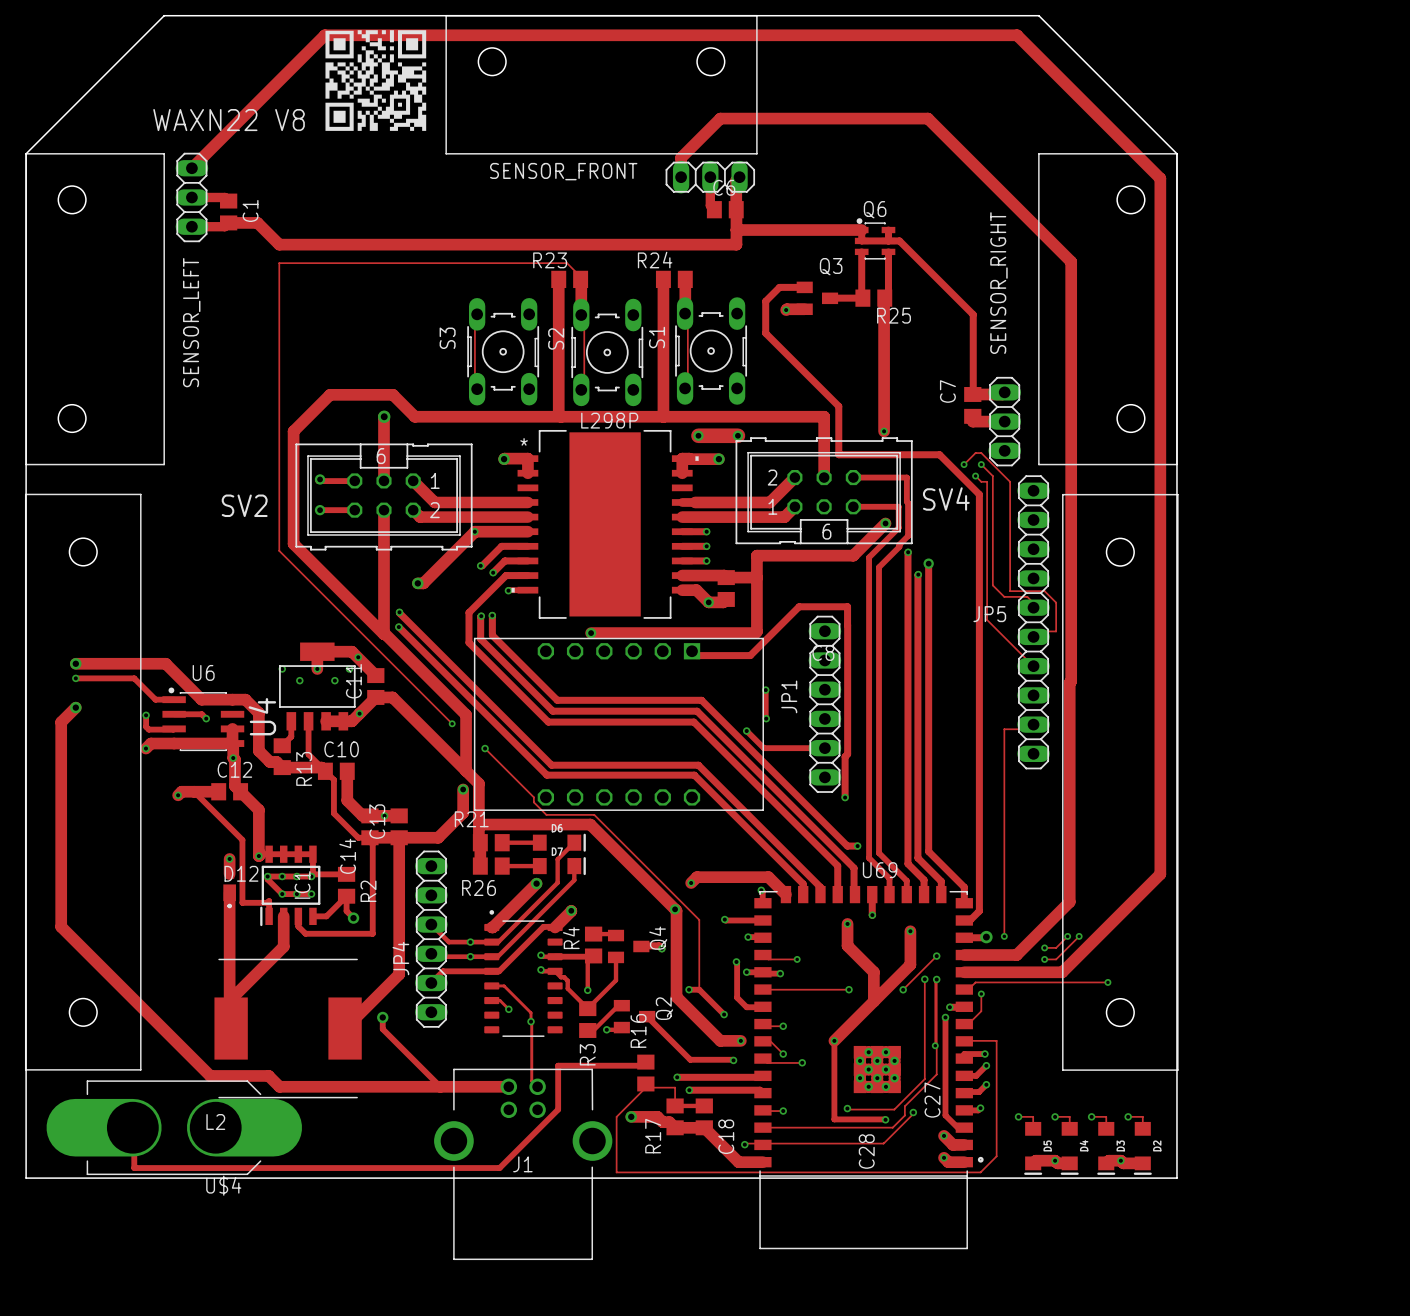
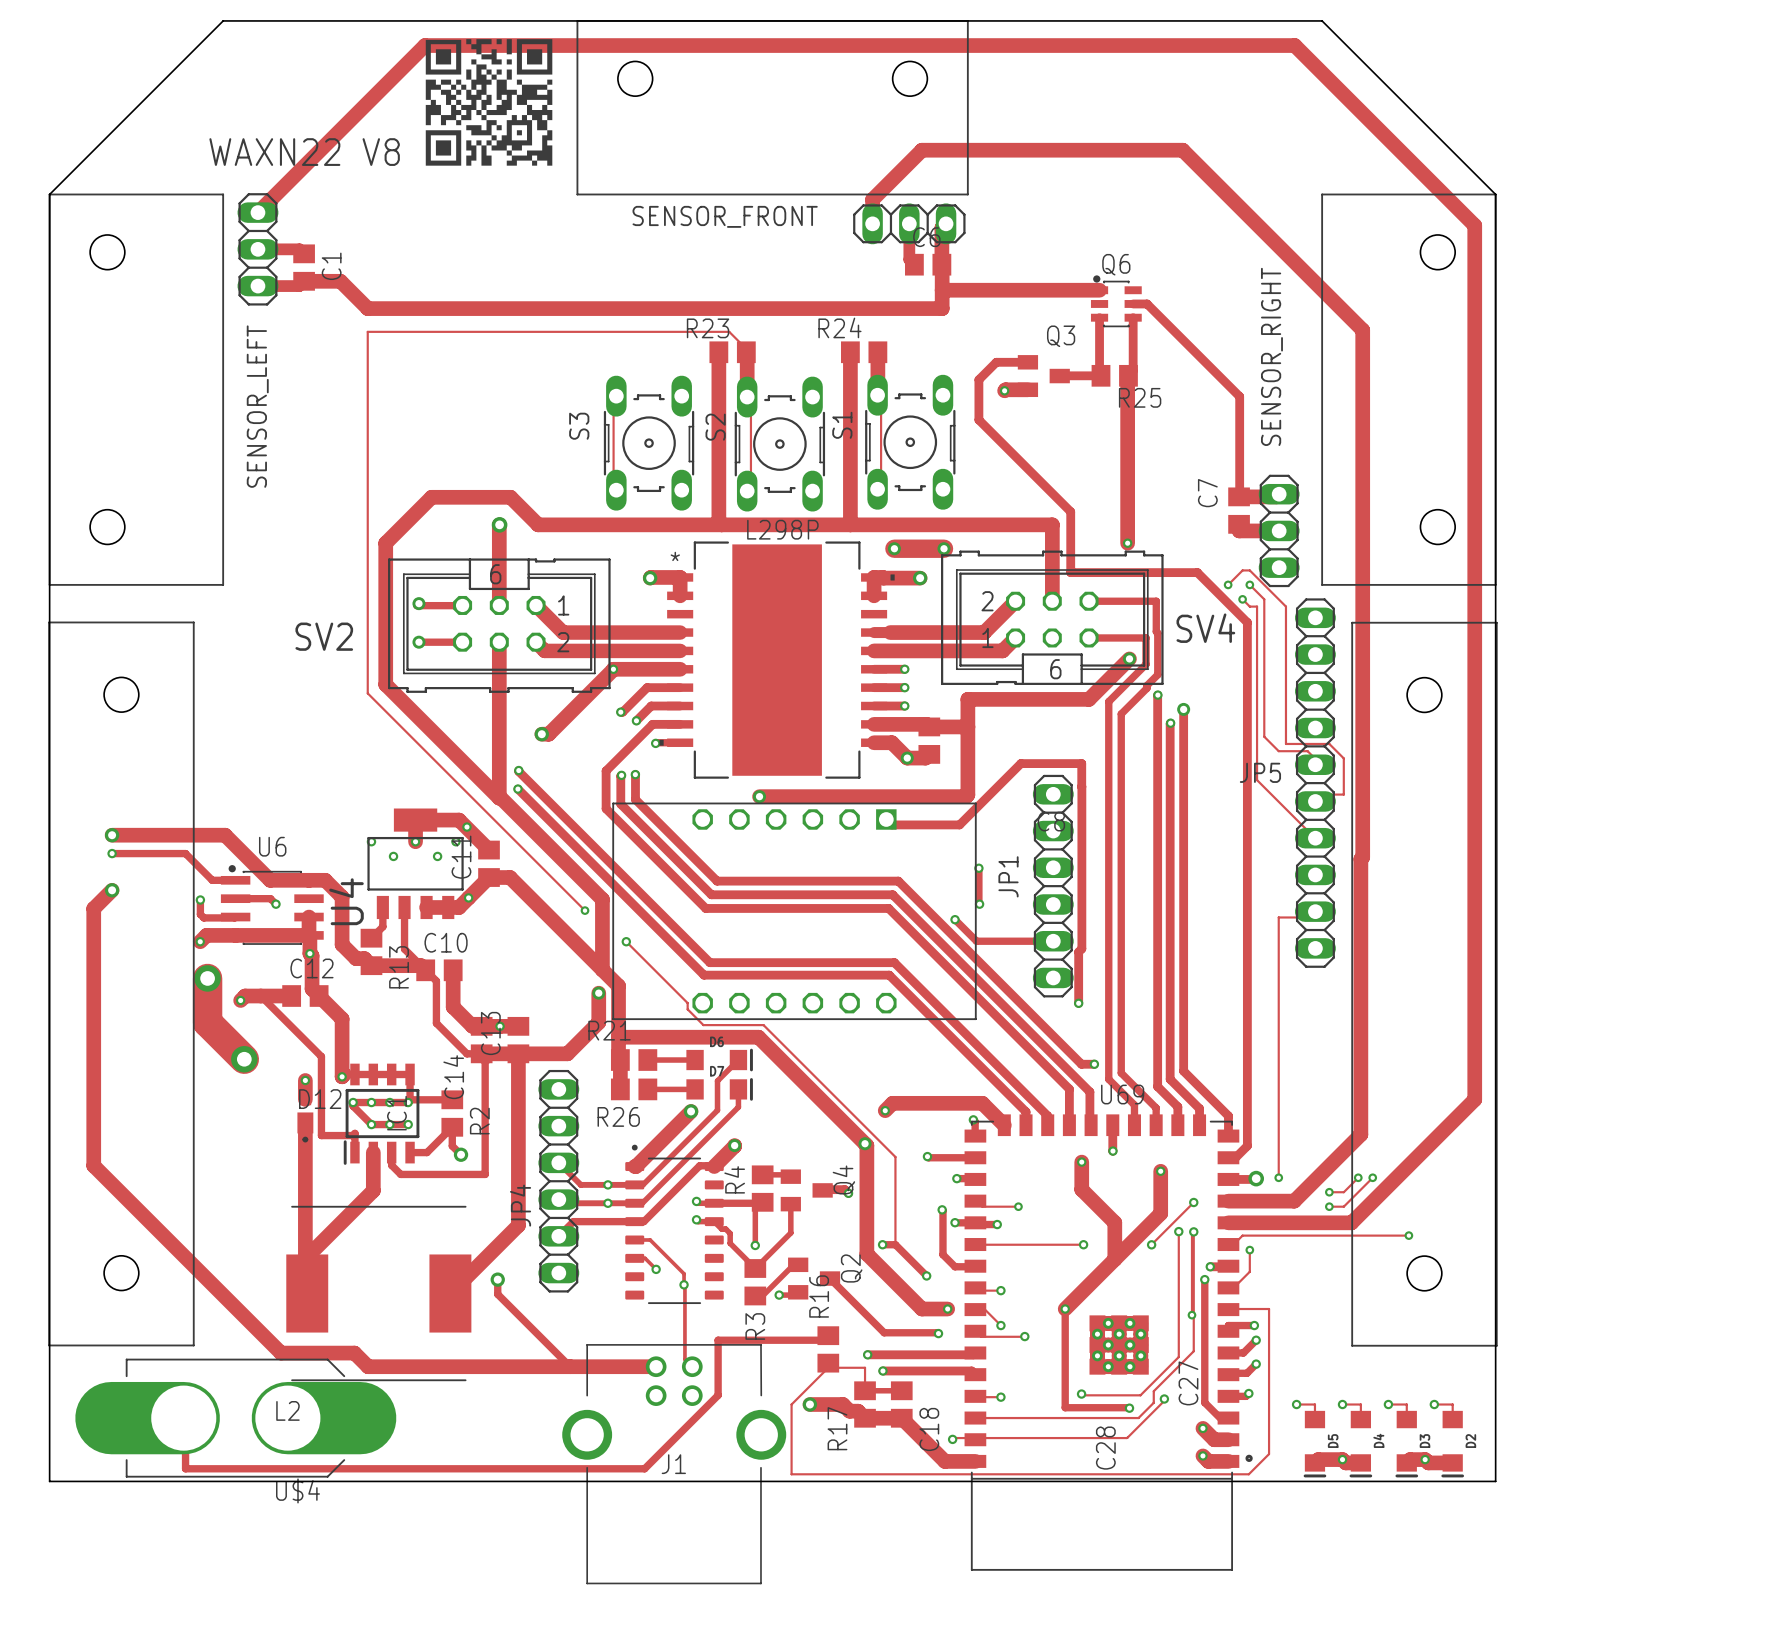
track: (861, 230) (861, 240) (888, 240) (888, 230) -> none
track: none -> (207, 978) (207, 1022) (244, 1059)
via: none -> (207, 978)
via: none -> (244, 1059)

